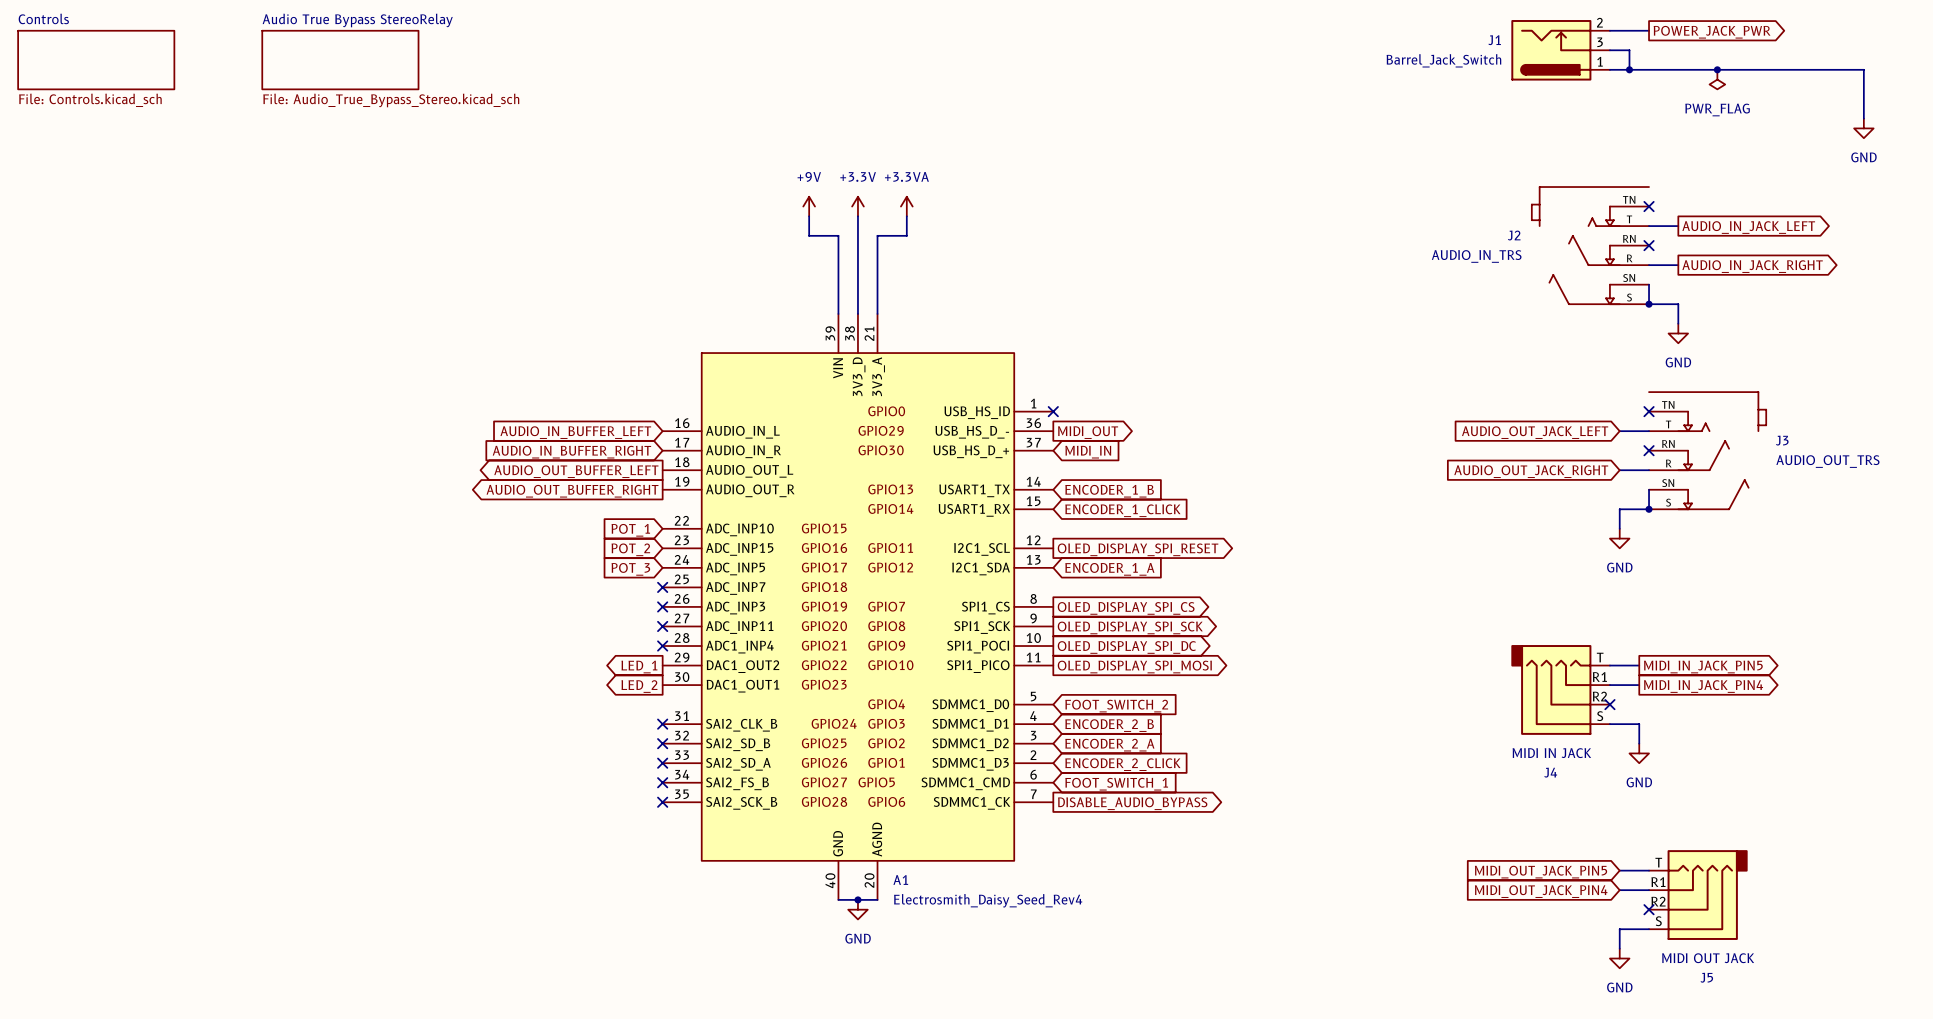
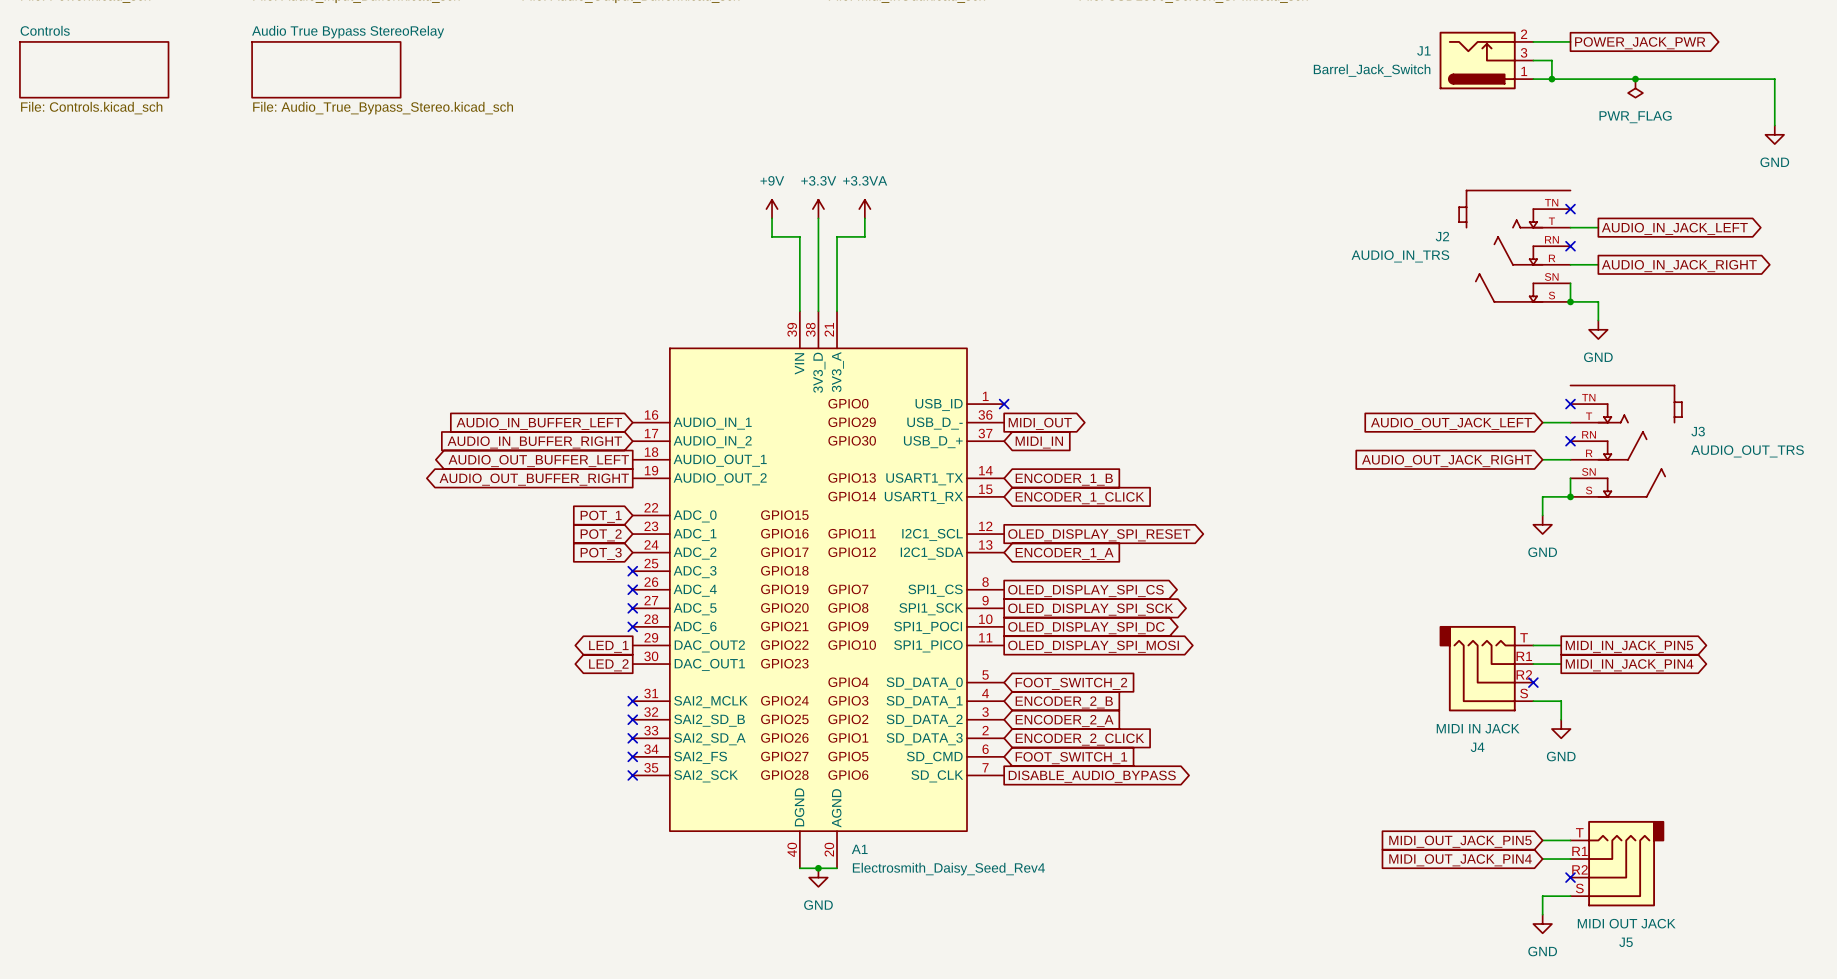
A1 symbol: [662, 313, 1054, 900] -> [632, 311, 1005, 869]

